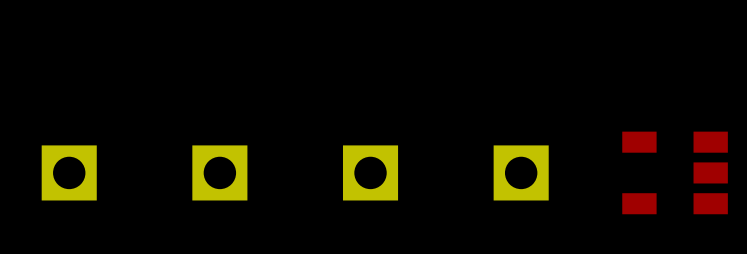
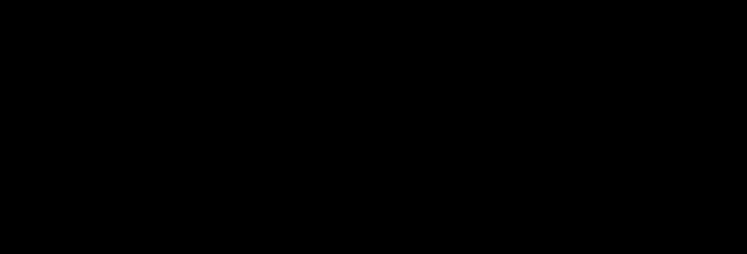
part: (69, 172) -> none
part: (219, 172) -> none
part: (370, 172) -> none
part: (521, 172) -> none
part: (675, 172) -> none

